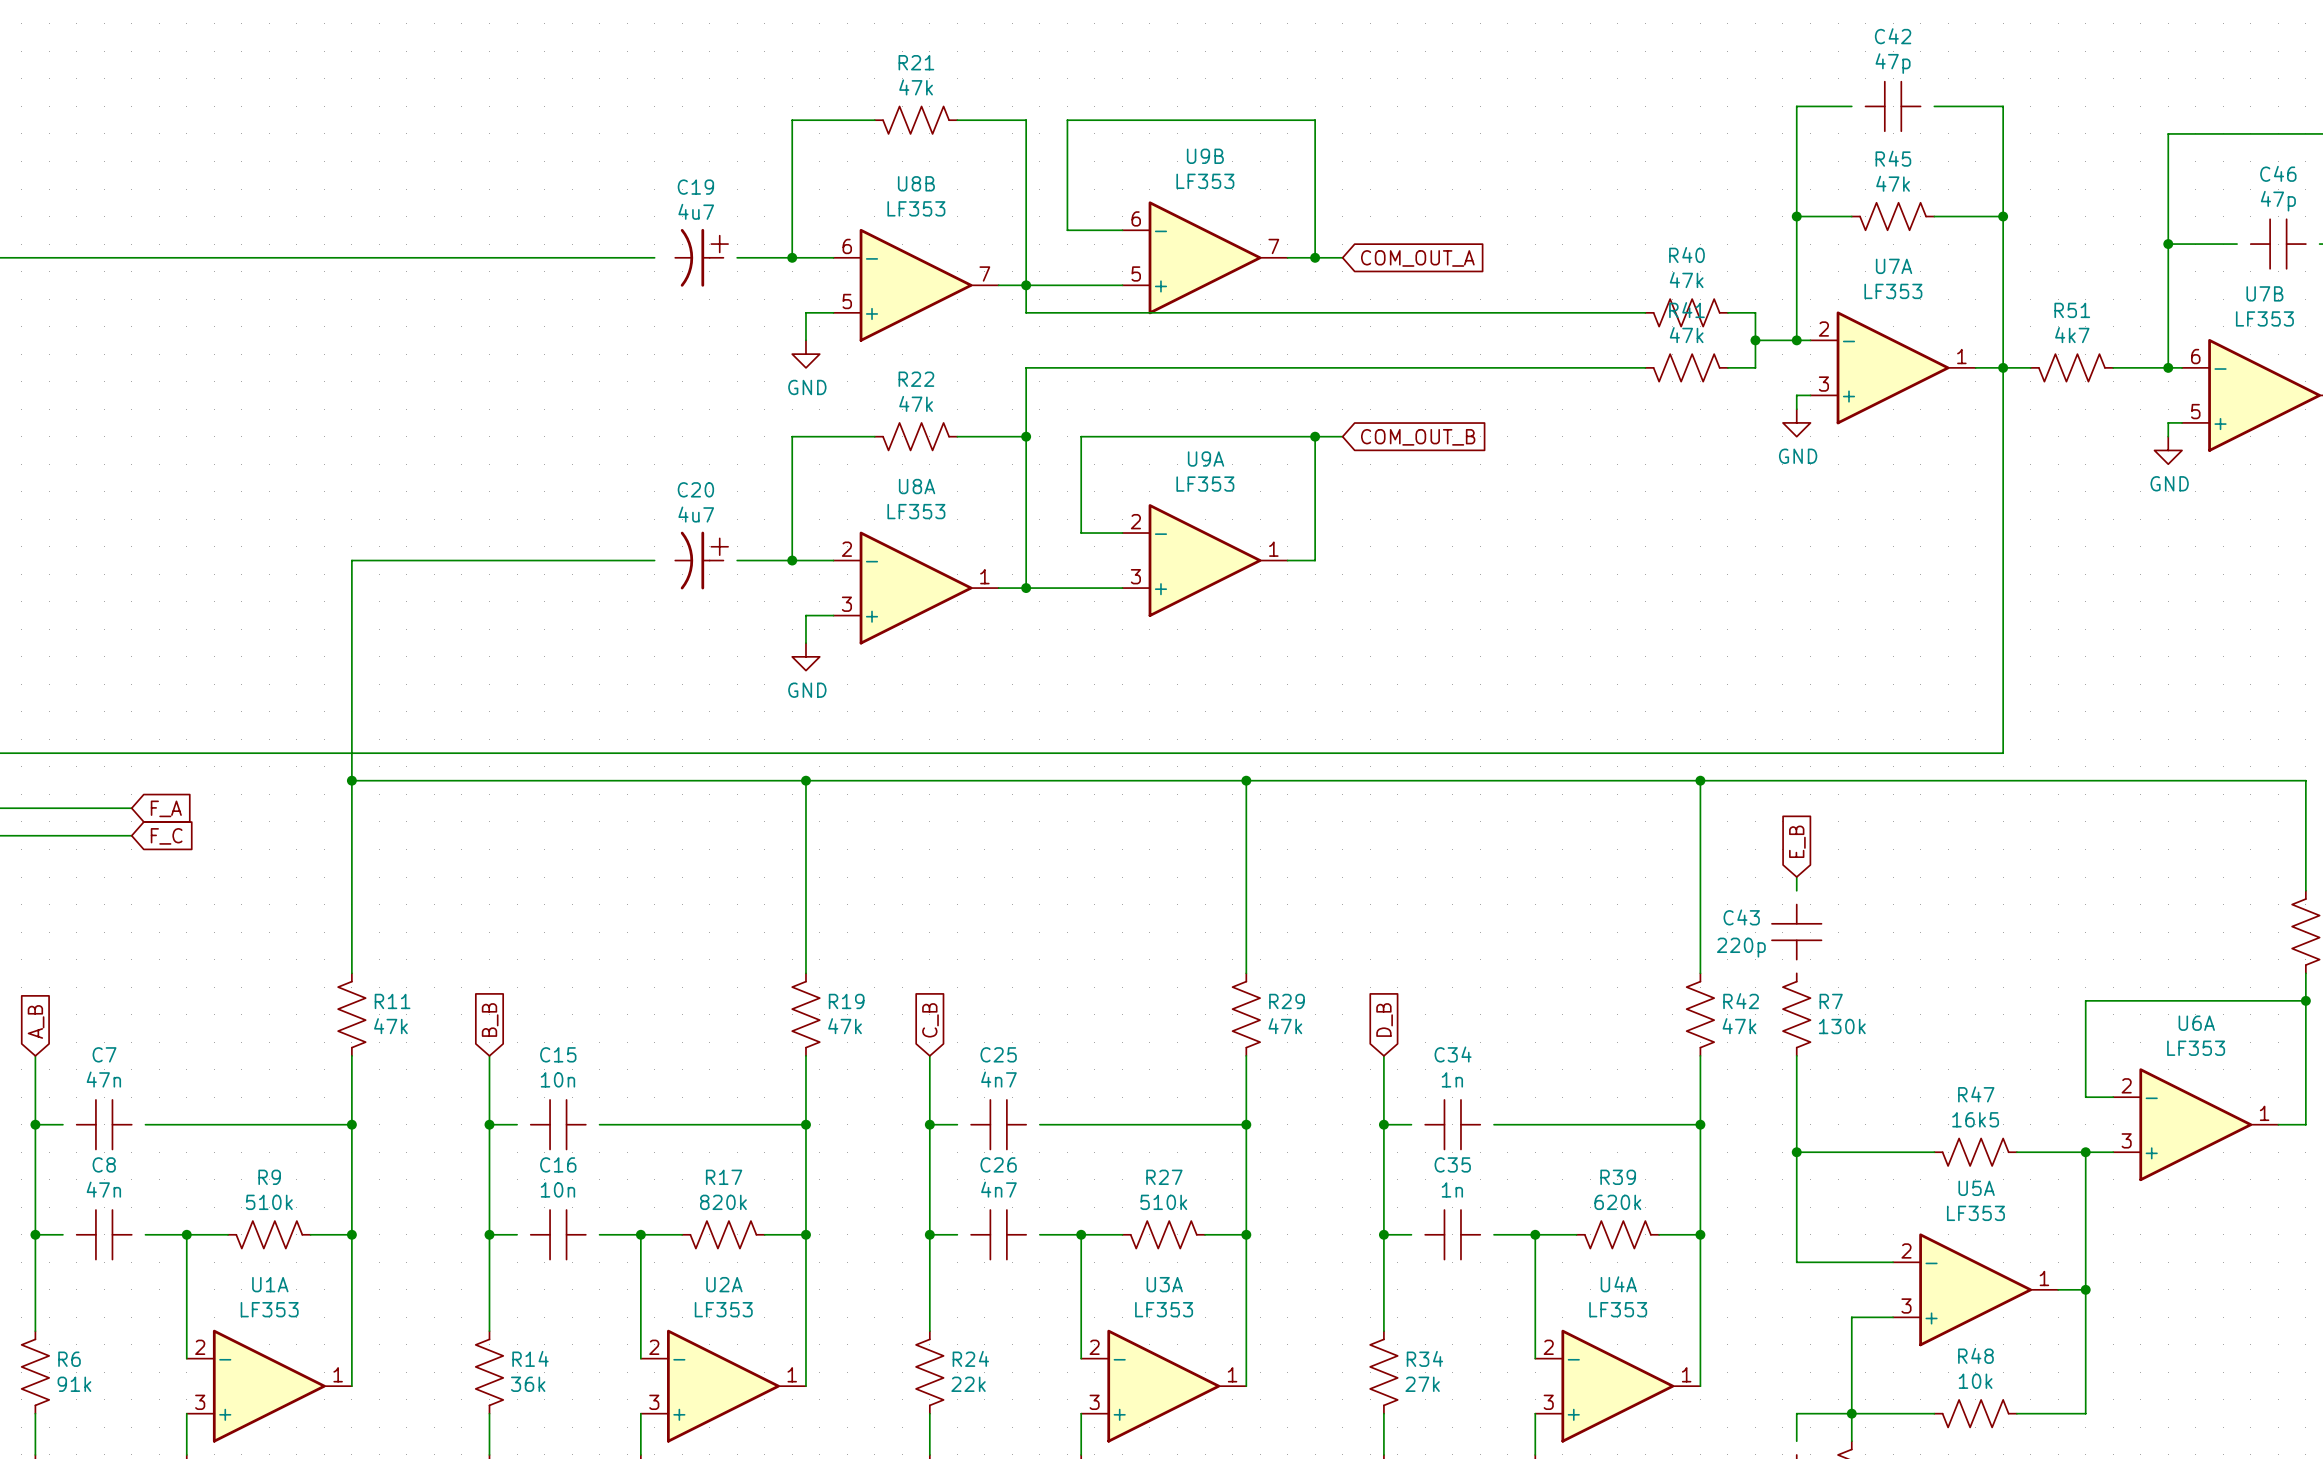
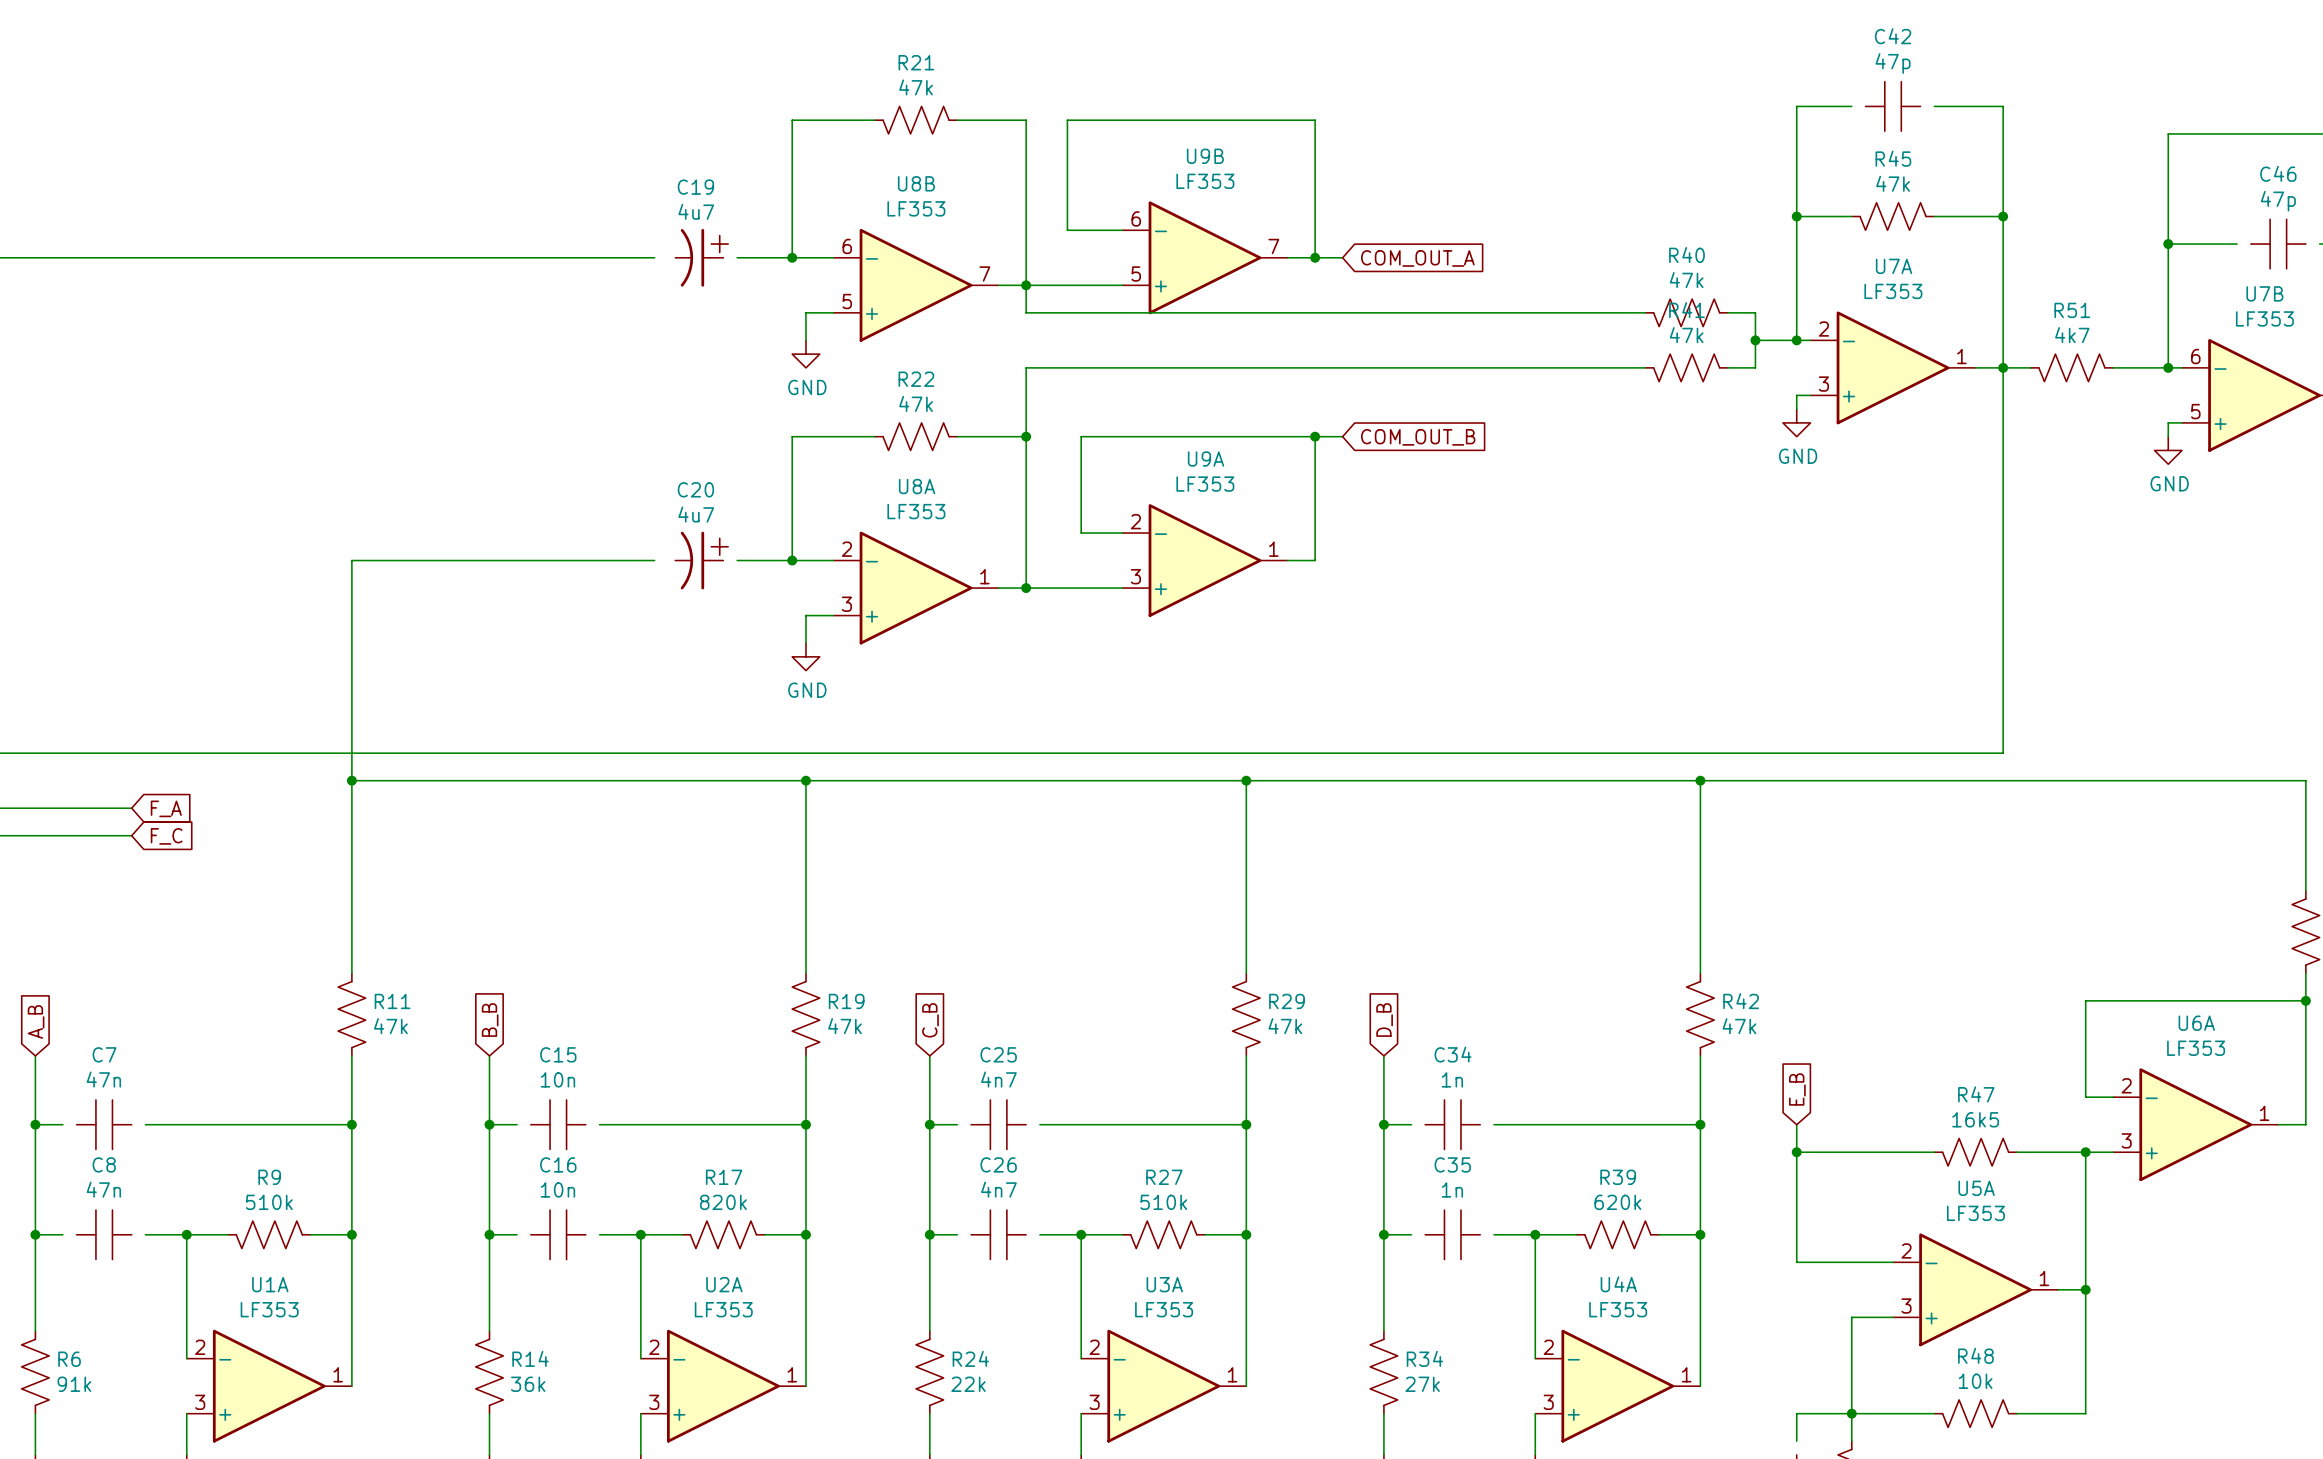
global label position: E_B (1797, 841) -> E_B (1797, 1089)
wire: (1796, 877) (1796, 890) -> none
C43: 220p (1796, 932) -> none
R7: 130k (1796, 1014) -> none
wire: (1796, 1055) (1796, 1124) -> none

